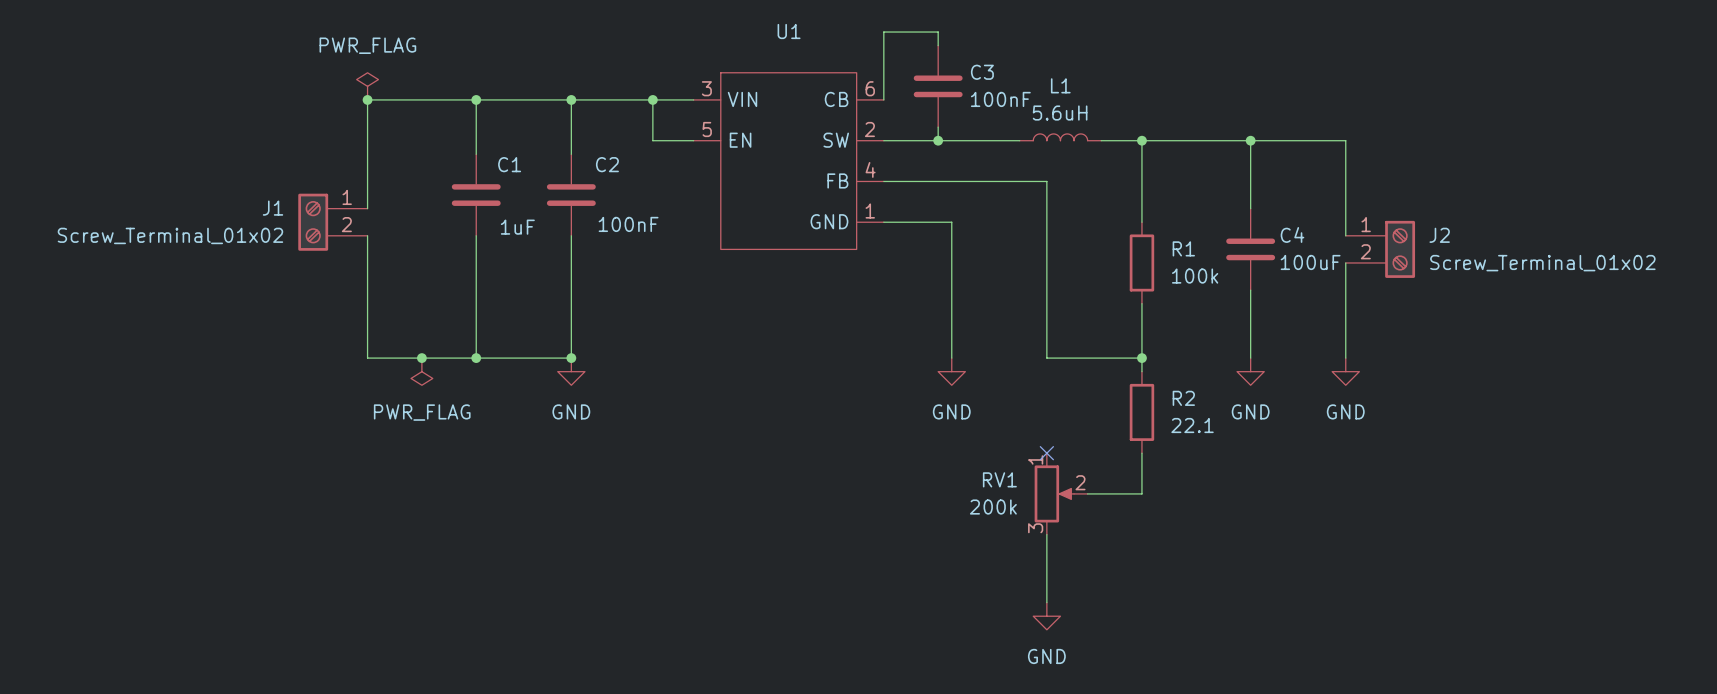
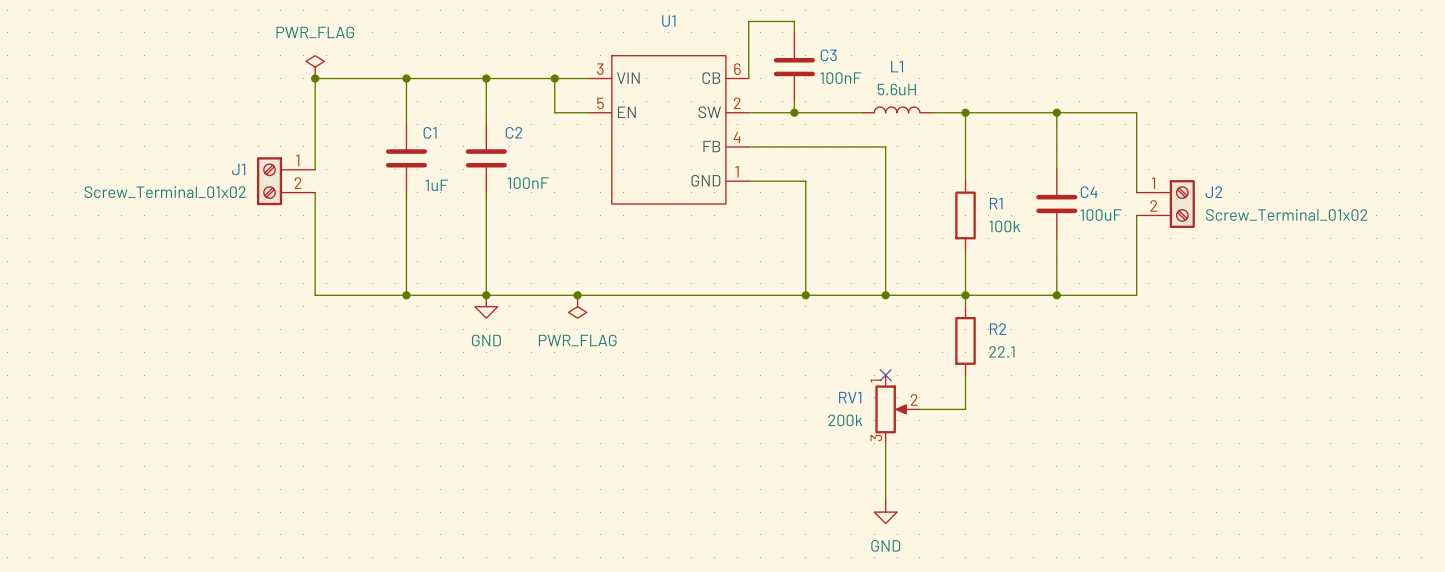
junction: (421, 358) -> none
wire: none -> (486, 295) (885, 295)
junction: none -> (577, 295)
junction: none -> (805, 295)
junction: none -> (885, 295)
wire: none -> (965, 295) (1136, 295)
junction: none -> (1056, 295)
power symbol position: PWR_FLAG (421, 371) -> PWR_FLAG (577, 306)
power symbol: GND (951, 371) -> none
power symbol: GND (1250, 371) -> none
power symbol: GND (1345, 371) -> none

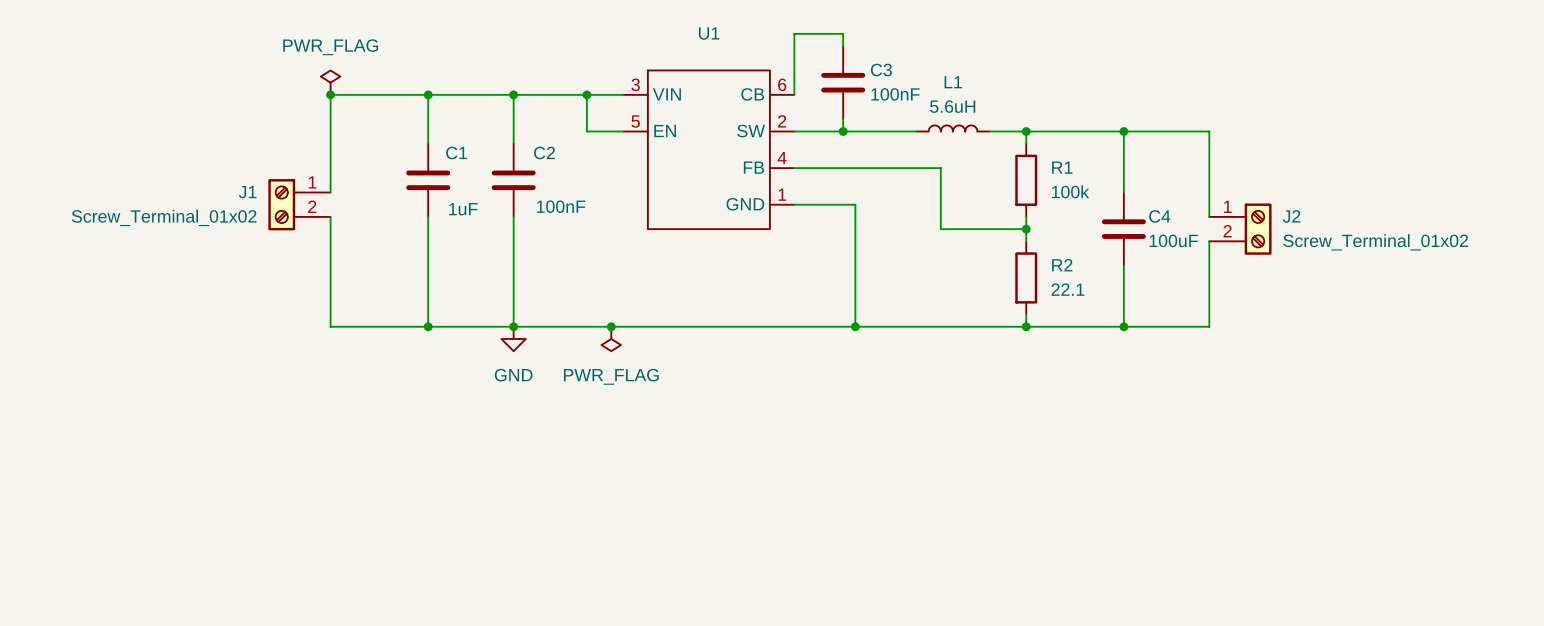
wire: (965, 124) (965, 181) -> none
wire: none -> (1026, 216) (1026, 241)
wire: (885, 204) (885, 295) -> (940, 229) (1026, 229)
junction: none -> (1026, 229)
R1 position: (965, 215) -> (1026, 180)
wire: (965, 249) (965, 283) -> none
junction: (885, 295) -> none
wire: (965, 295) (965, 306) -> none
R2 position: (965, 340) -> (1026, 277)
no-connect mark: (885, 375) -> none
wire: (965, 375) (965, 409) (919, 409) -> none
RV1: 200k (897, 409) -> none
wire: (885, 443) (885, 500) -> none
power symbol: GND (885, 512) -> none

